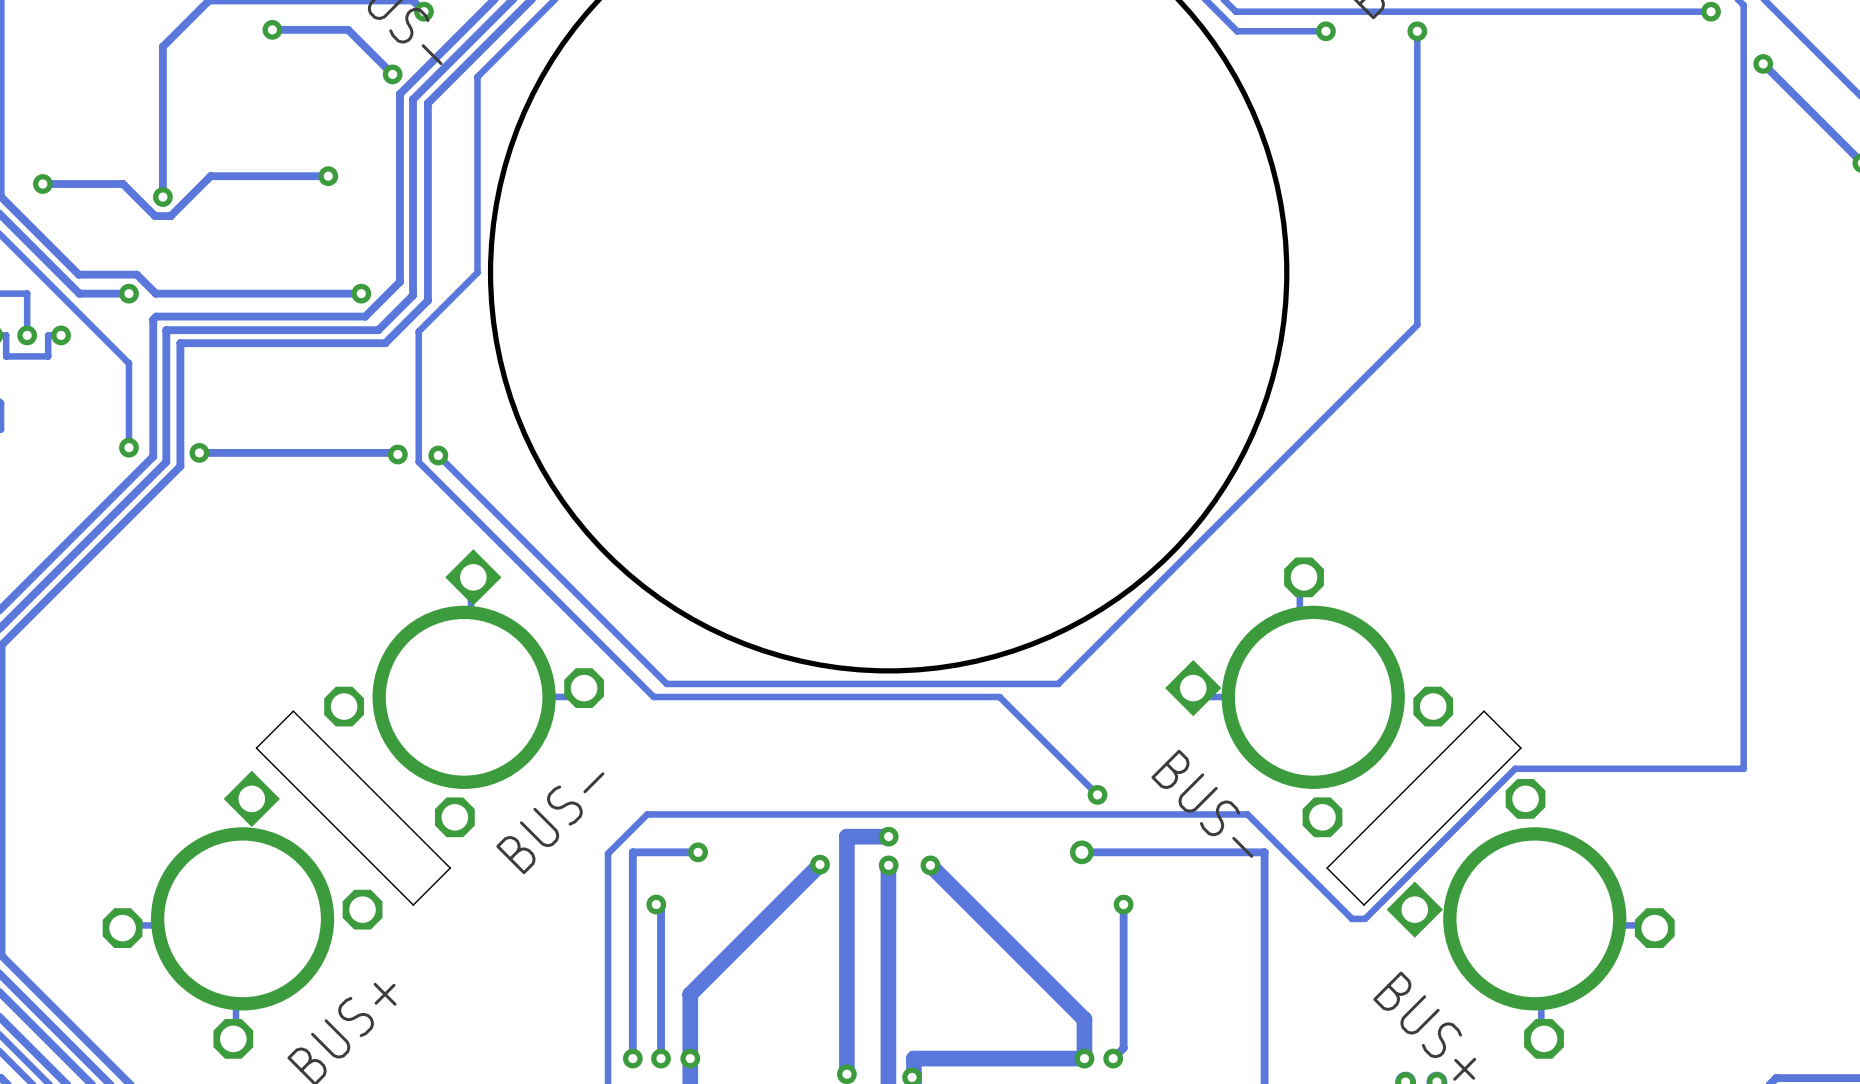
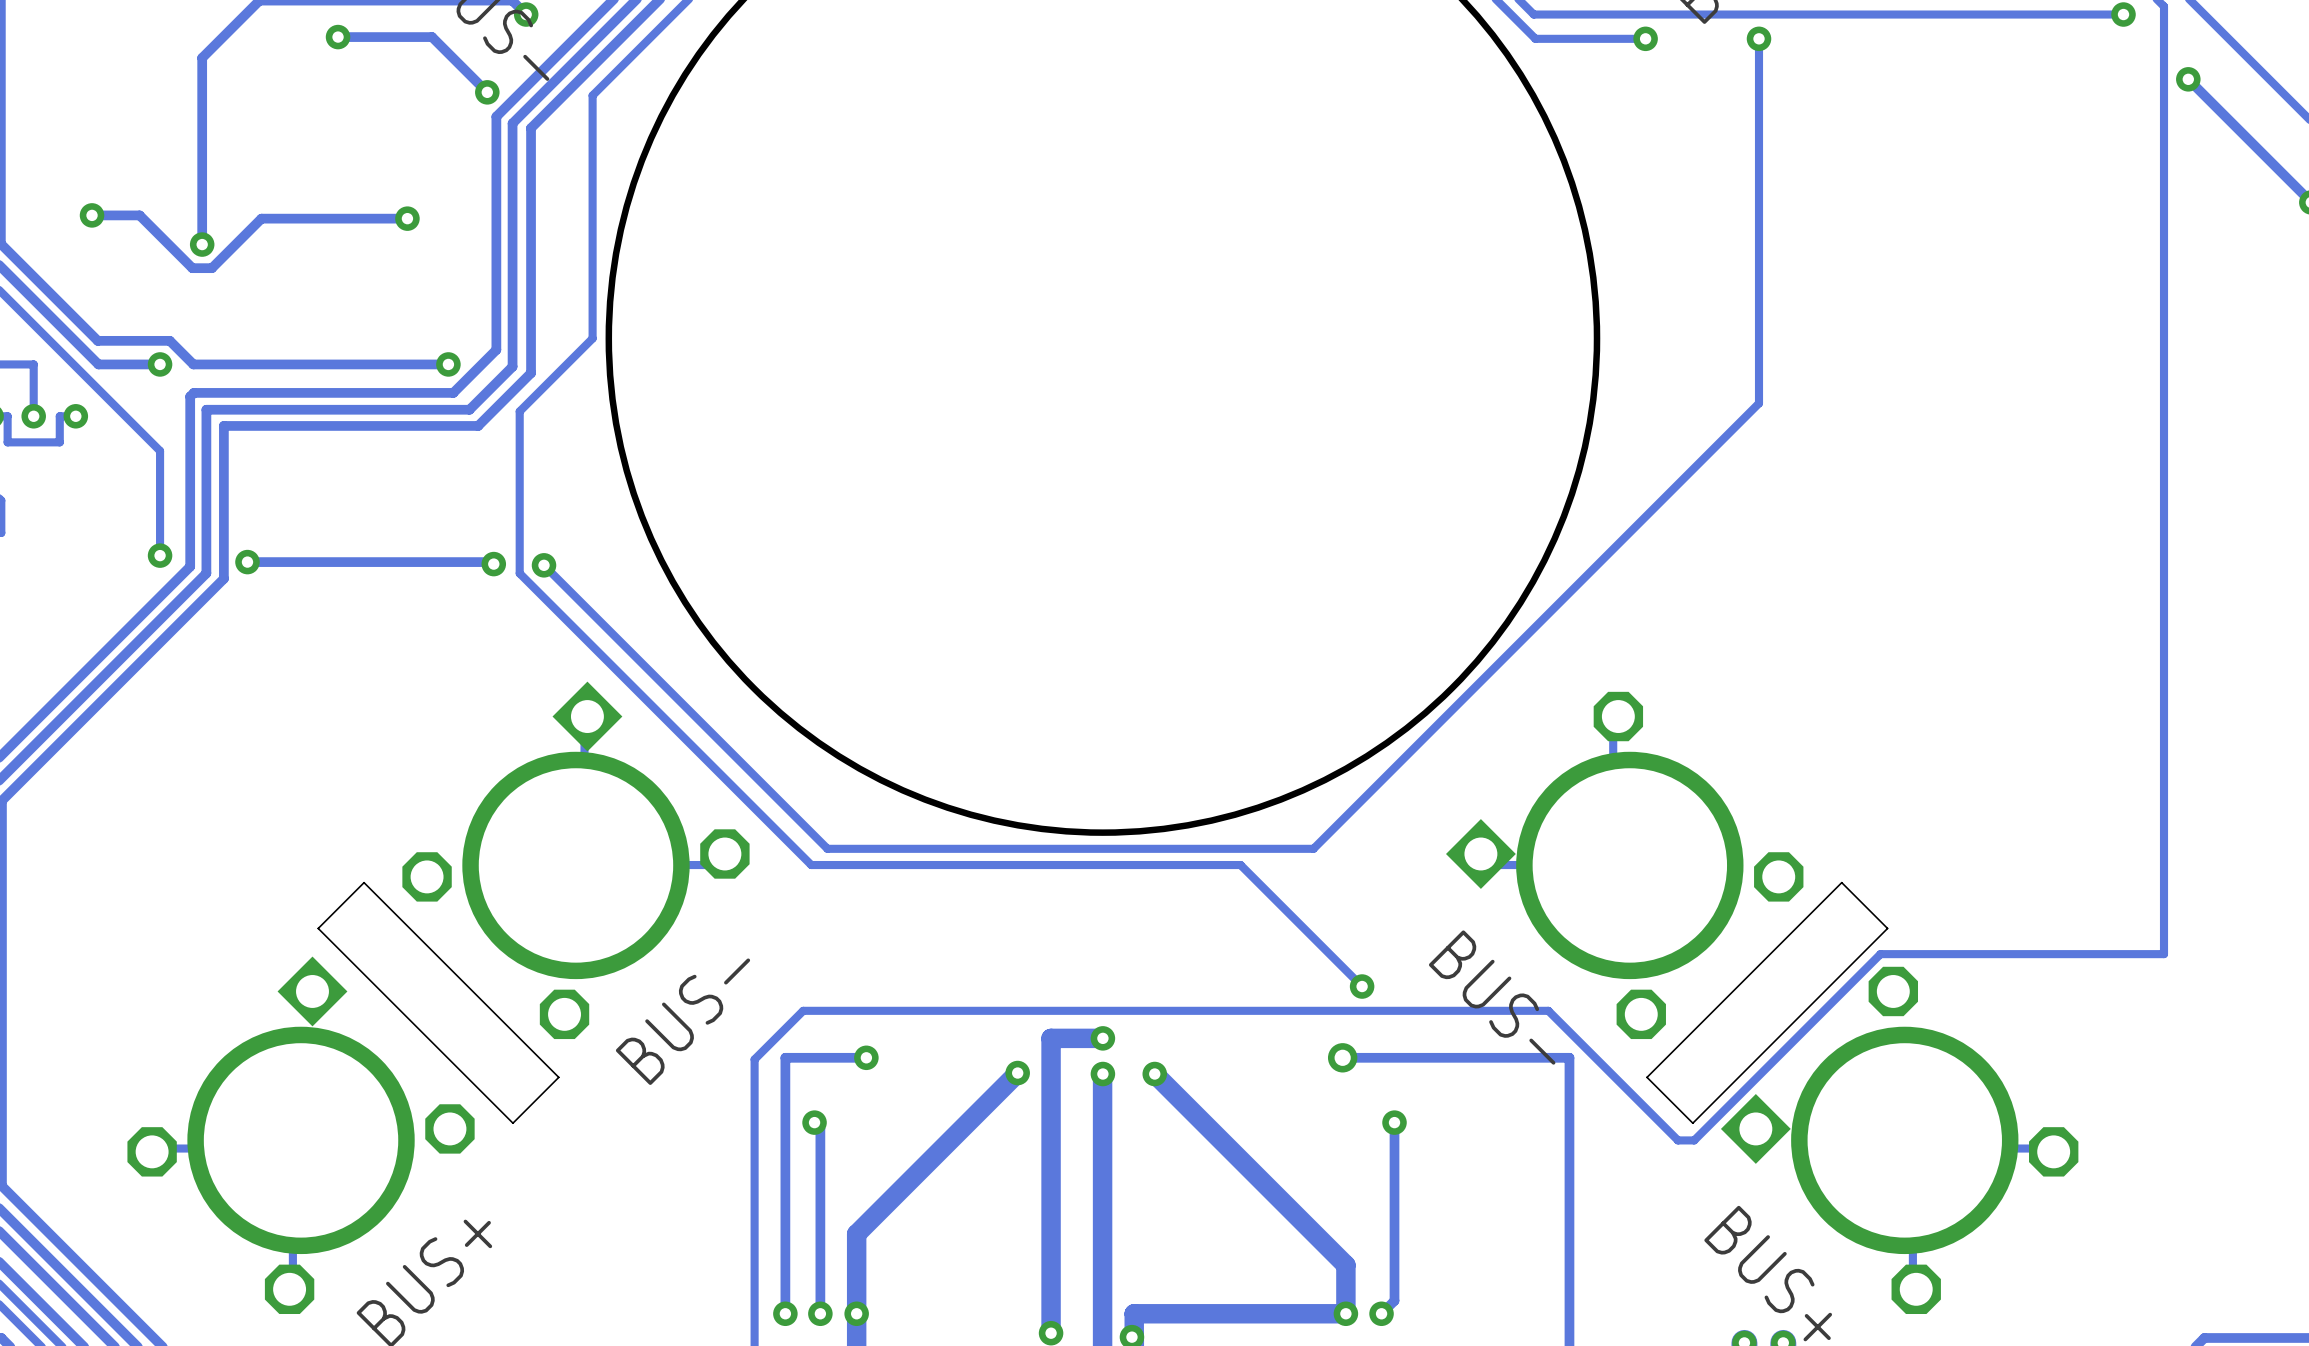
via position: (42, 184) -> (92, 215)
track: (122, 184) (42, 184) -> (152, 228) (139, 215) (92, 215)

